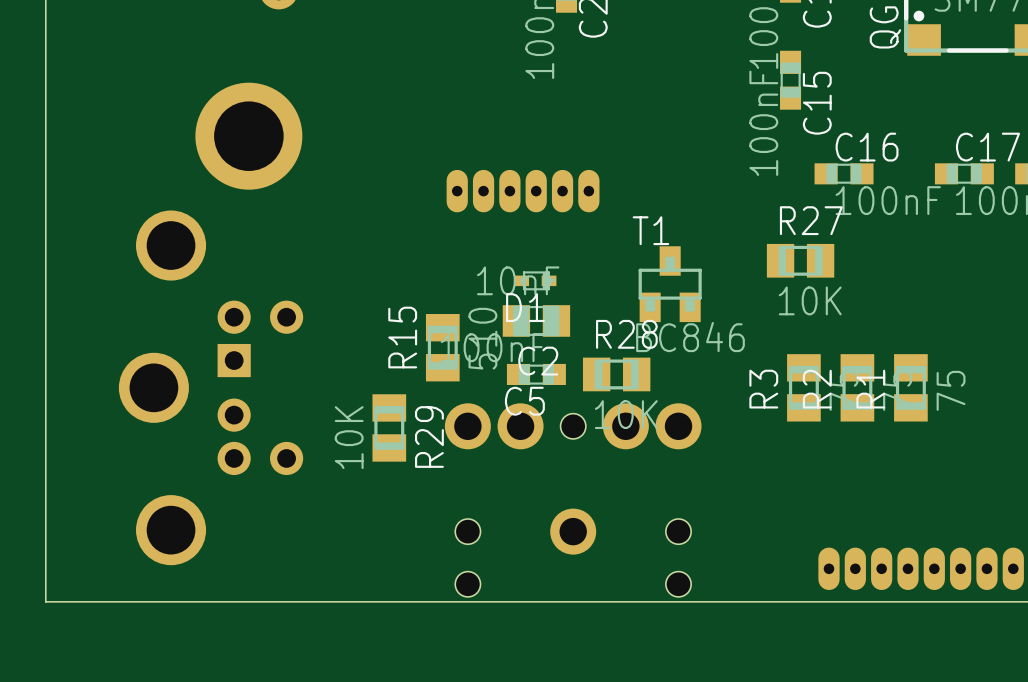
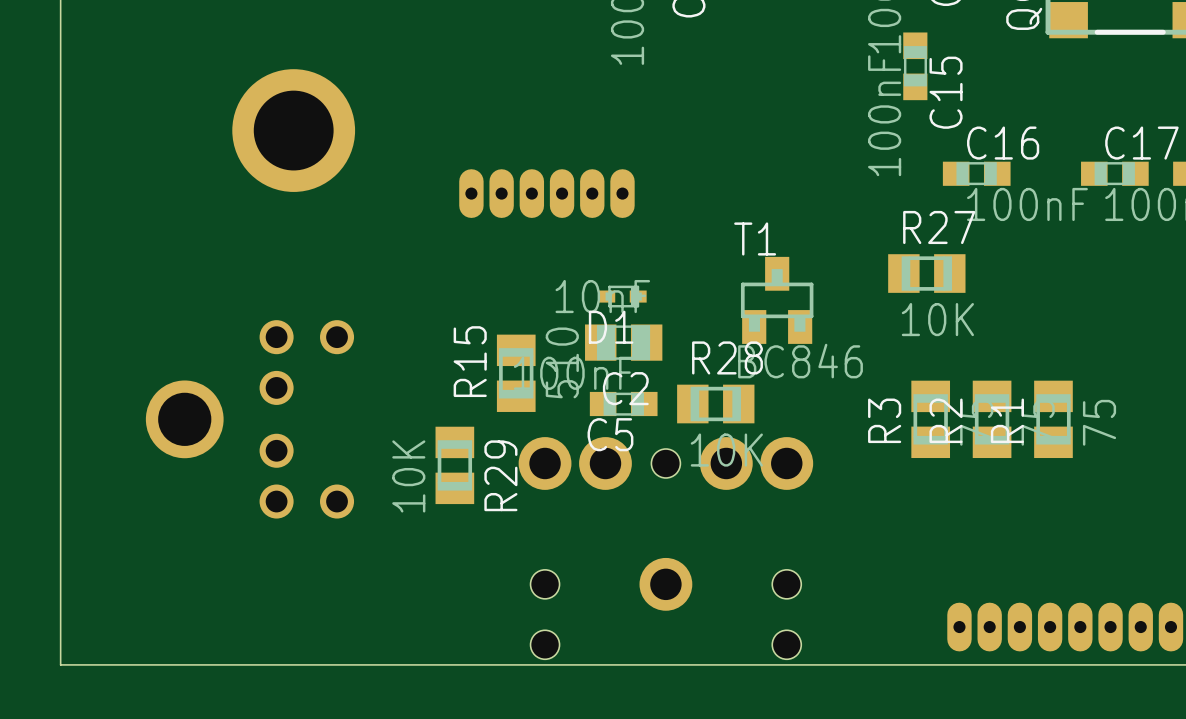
part position: (523, 191) -> (546, 193)
part footprint: [118, 210, 304, 566] -> [145, 320, 355, 519]

